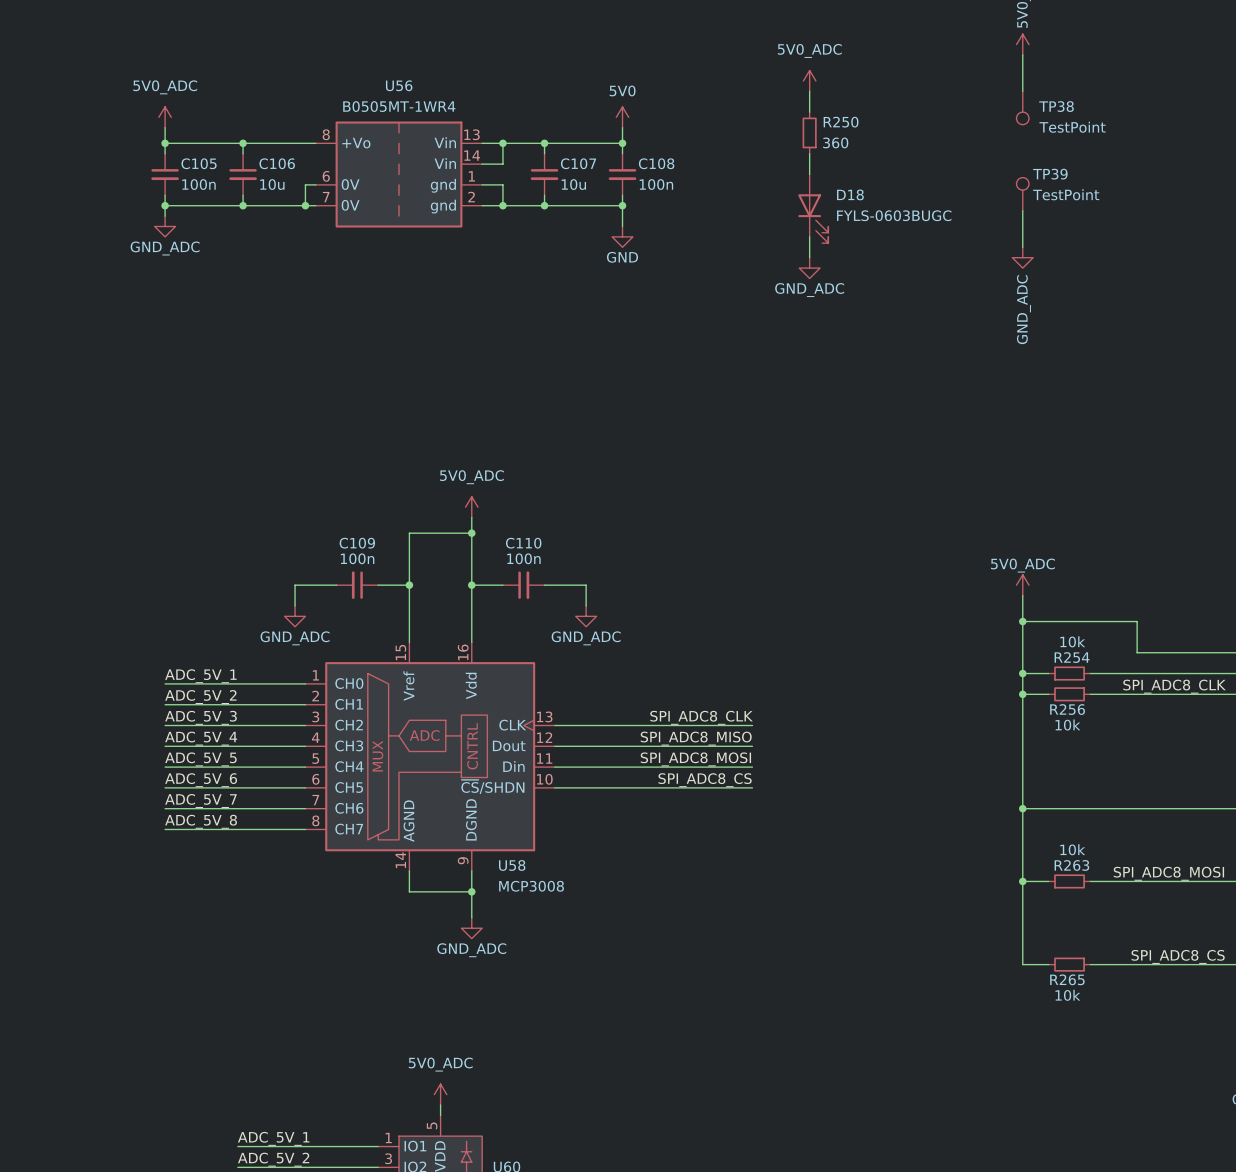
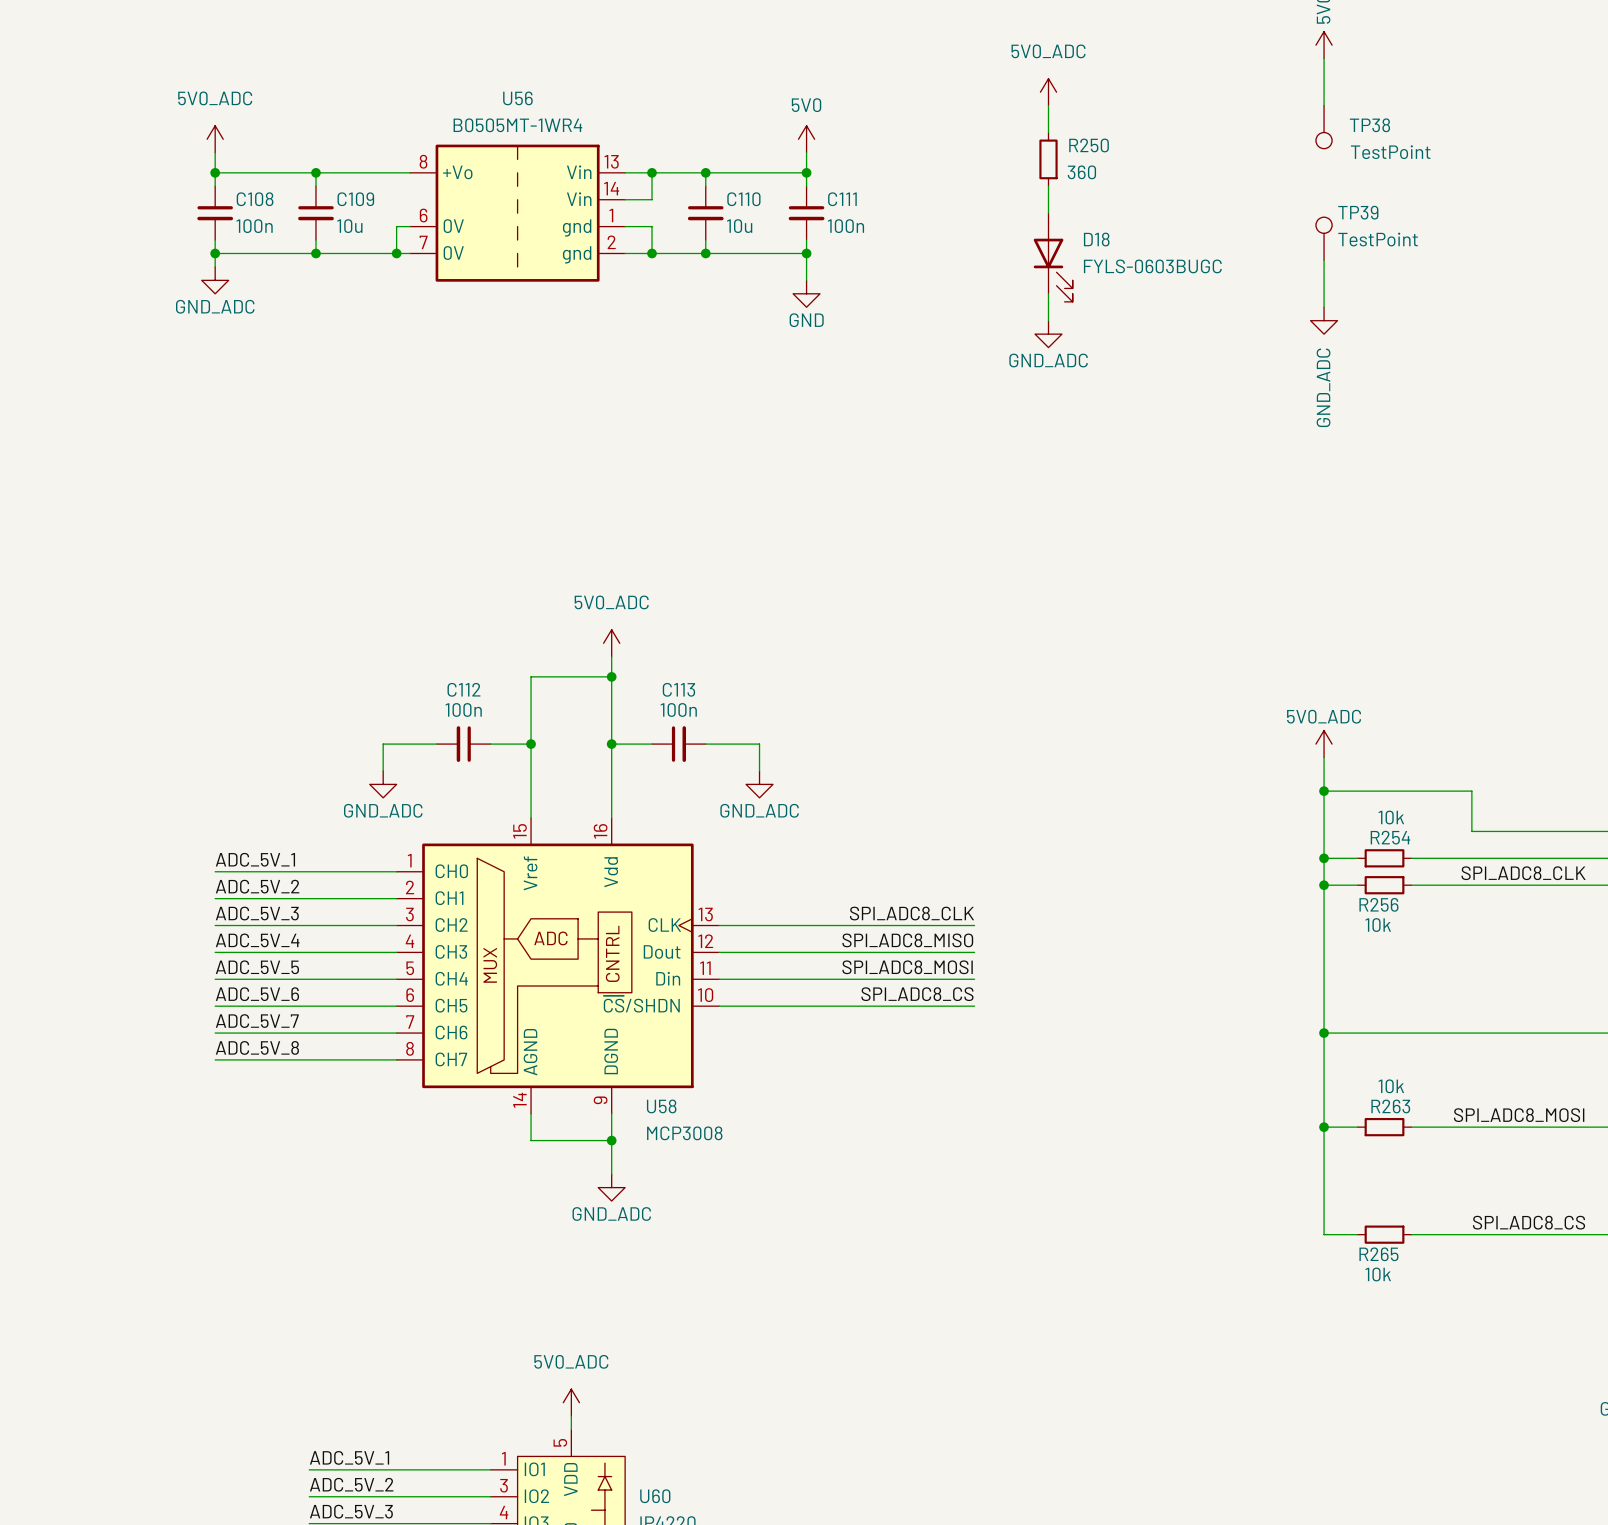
C105 name: C105 (199, 163) -> C108 (255, 199)
C106 name: C106 (277, 163) -> C109 (355, 199)
C107 name: C107 (578, 163) -> C110 (743, 199)
C108 name: C108 (656, 163) -> C111 (842, 199)
C109 name: C109 (357, 543) -> C112 (463, 689)
C110 name: C110 (523, 543) -> C113 (678, 689)

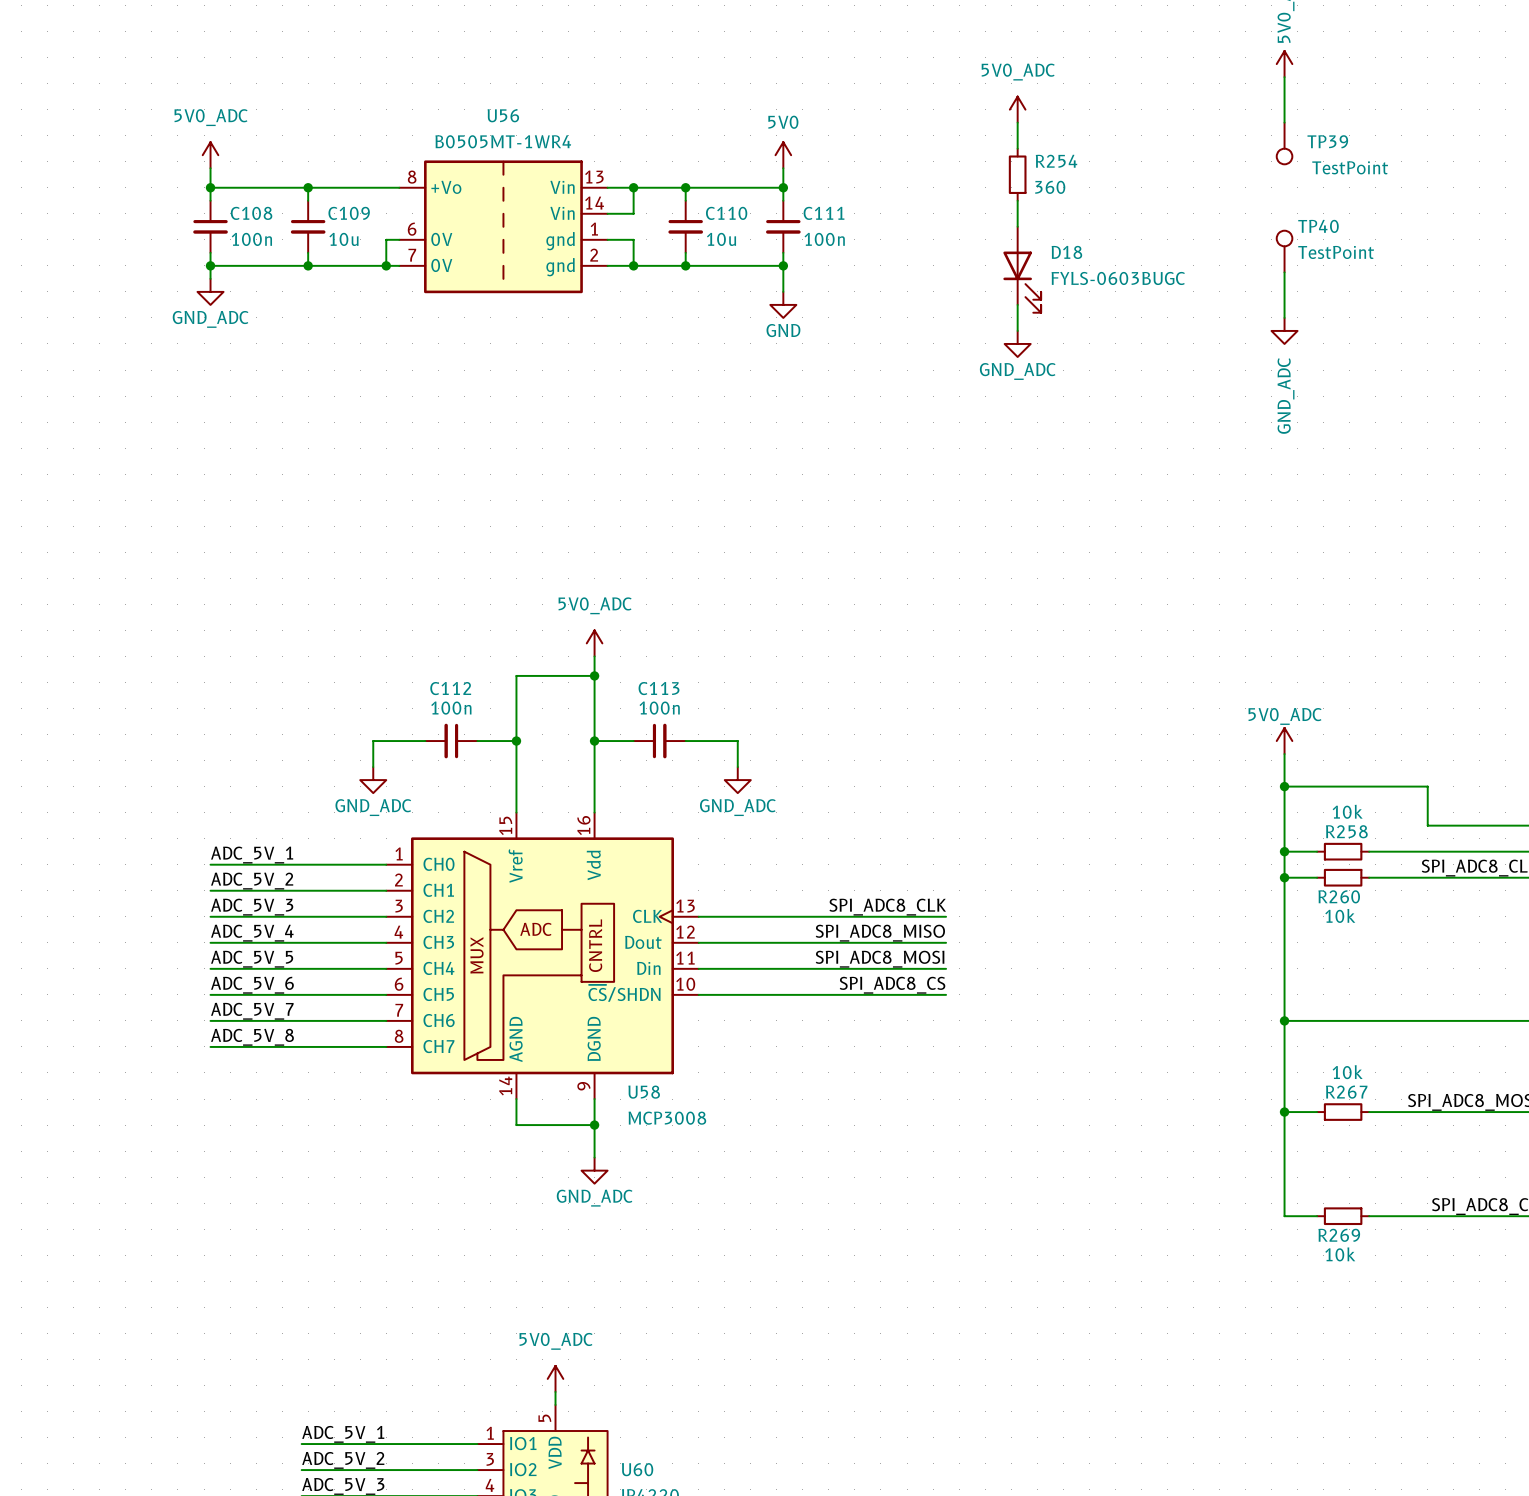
TP38 name: TP38 (1369, 125) -> TP39 (1327, 141)
R250 name: R250 (1089, 145) -> R254 (1056, 161)
TP39 name: TP39 (1358, 212) -> TP40 (1318, 226)
R254 name: R254 (1390, 837) -> R258 (1346, 831)
R256 name: R256 (1378, 904) -> R260 (1339, 896)
R263 name: R263 (1390, 1106) -> R267 (1346, 1092)
R265 name: R265 (1378, 1254) -> R269 (1339, 1235)

